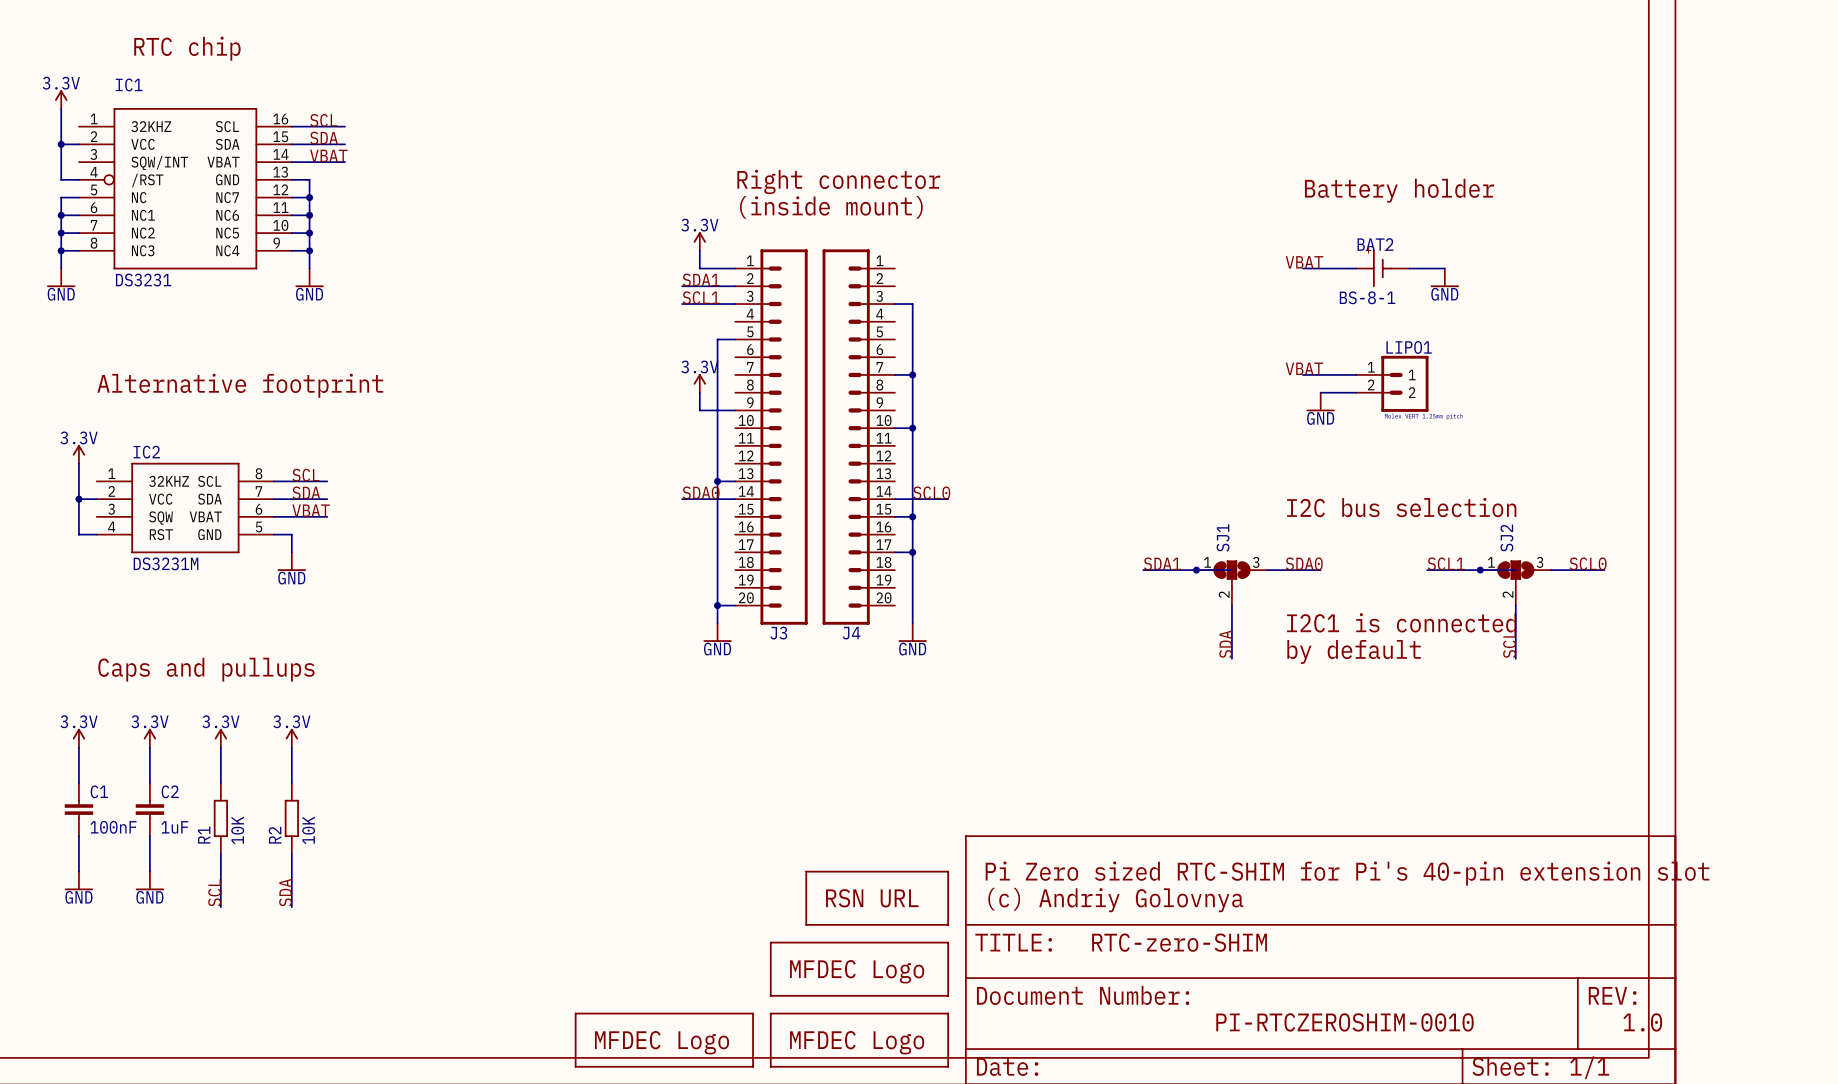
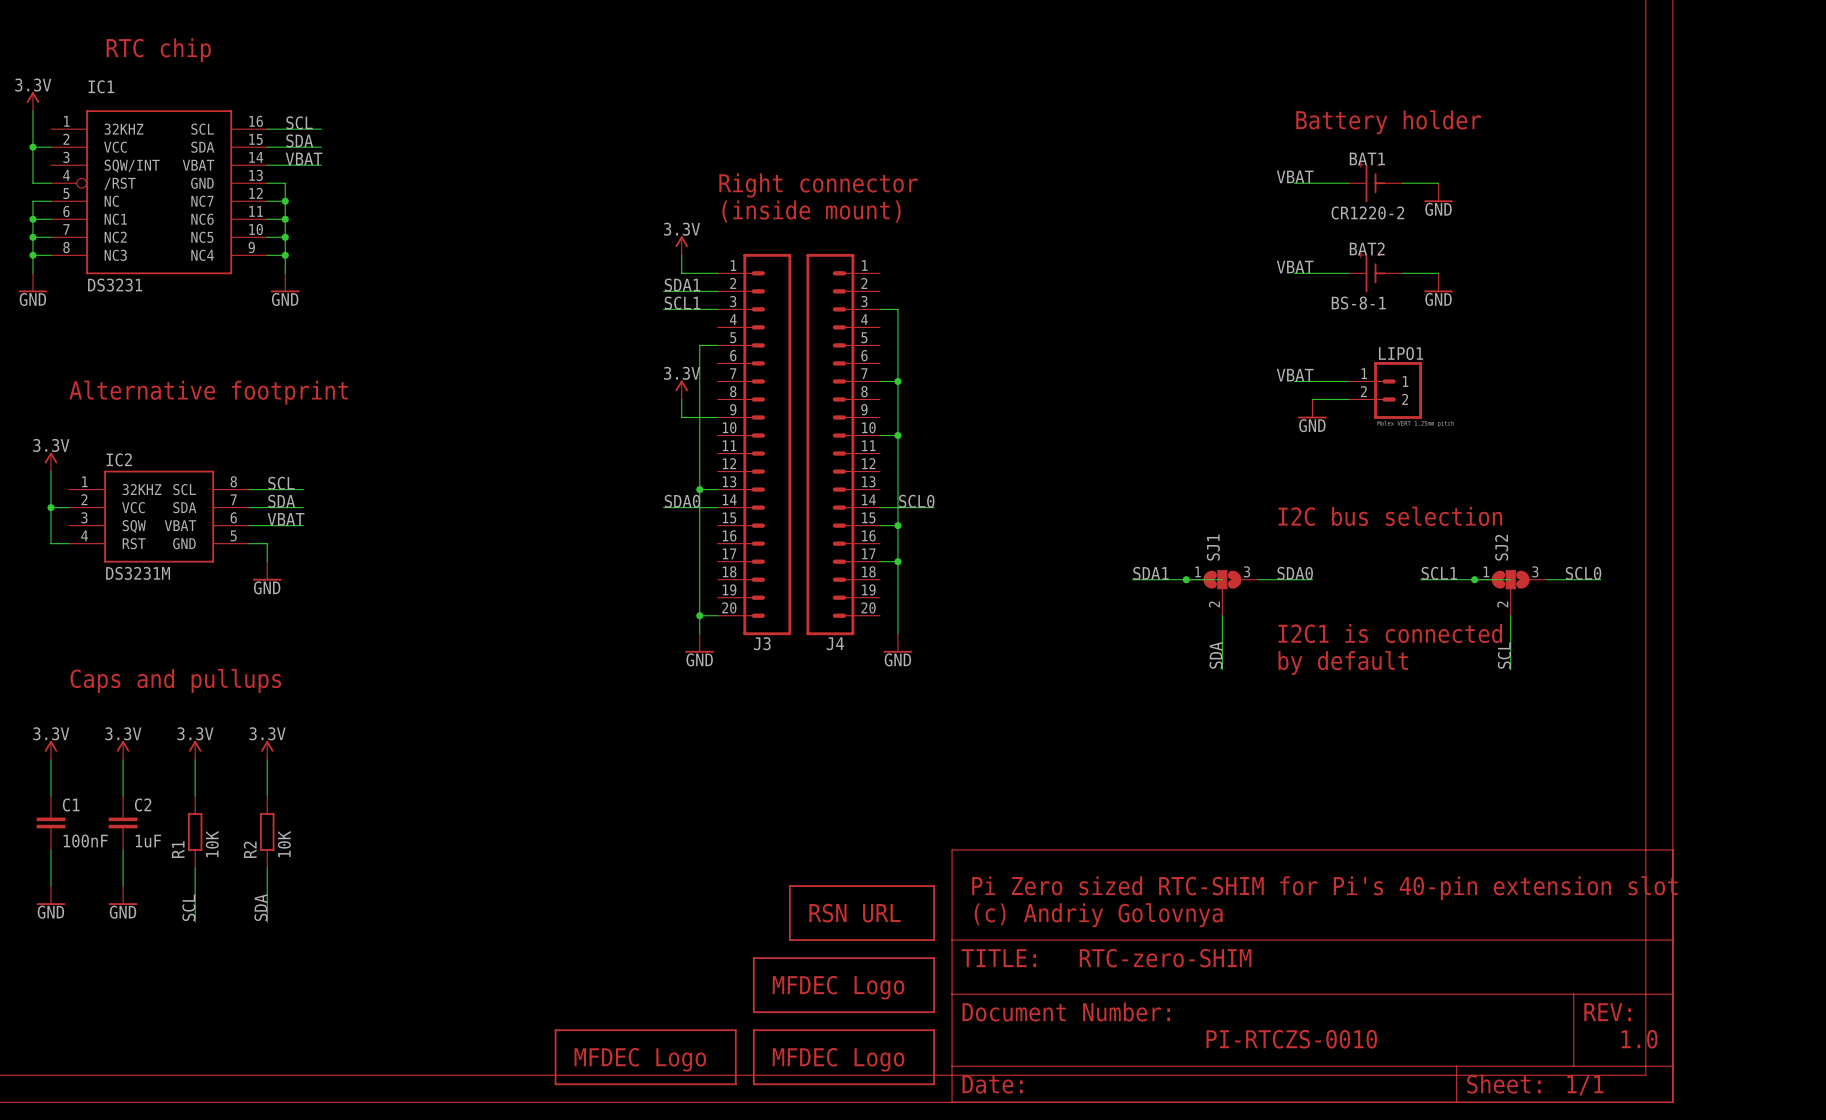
label: none -> VBAT (1295, 176)
wire: none -> (1294, 183) (1348, 183)
BAT1: none -> CR1220-2 (1375, 183)
wire: none -> (1402, 183) (1438, 183)
power symbol: none -> GND (1438, 192)
text position: Battery holder (1399, 190) -> Battery holder (1388, 122)
text: PI-RTCZEROSHIM-0010 (1344, 1022) -> PI-RTCZS-0010 (1291, 1039)

